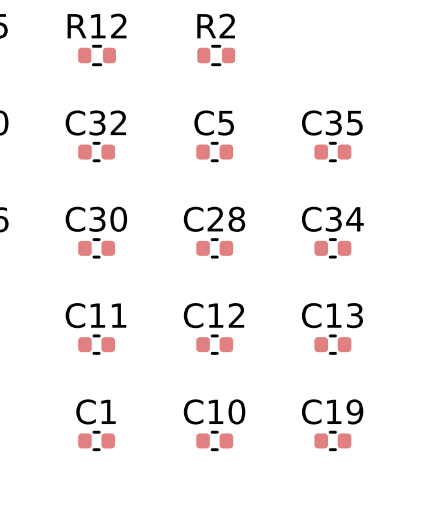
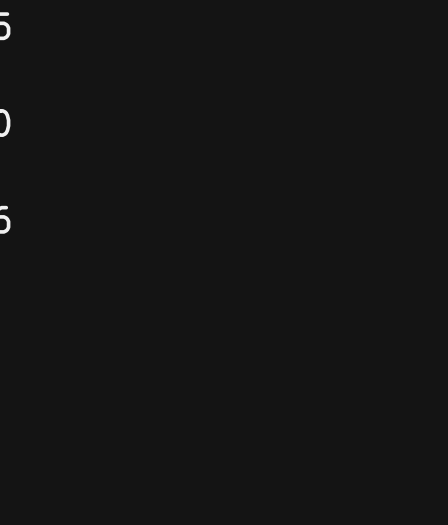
R12: (97, 55) -> none
R2: (216, 55) -> none
C32: (96, 152) -> none
C5: (214, 152) -> none
C35: (332, 152) -> none
C30: (96, 248) -> none
C28: (214, 248) -> none
C34: (332, 248) -> none
C11: (96, 344) -> none
C12: (214, 344) -> none
C13: (332, 344) -> none
C1: (96, 440) -> none
C10: (214, 440) -> none
C19: (332, 440) -> none

